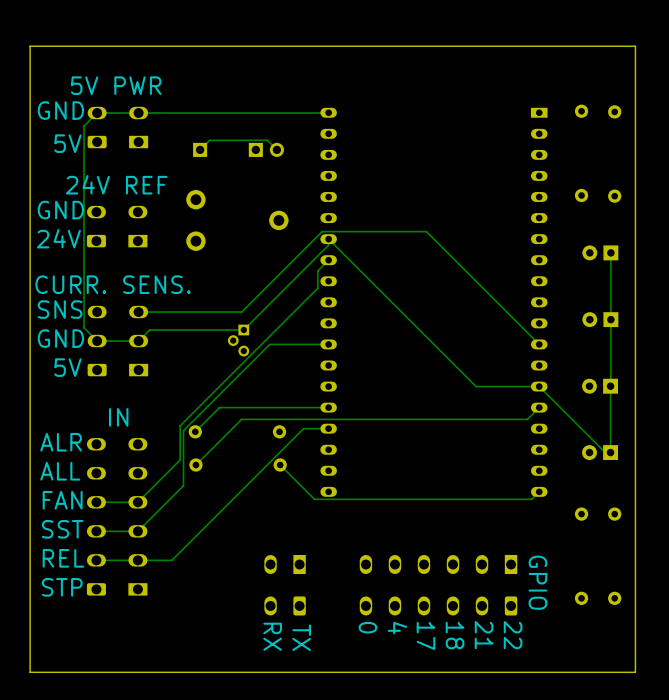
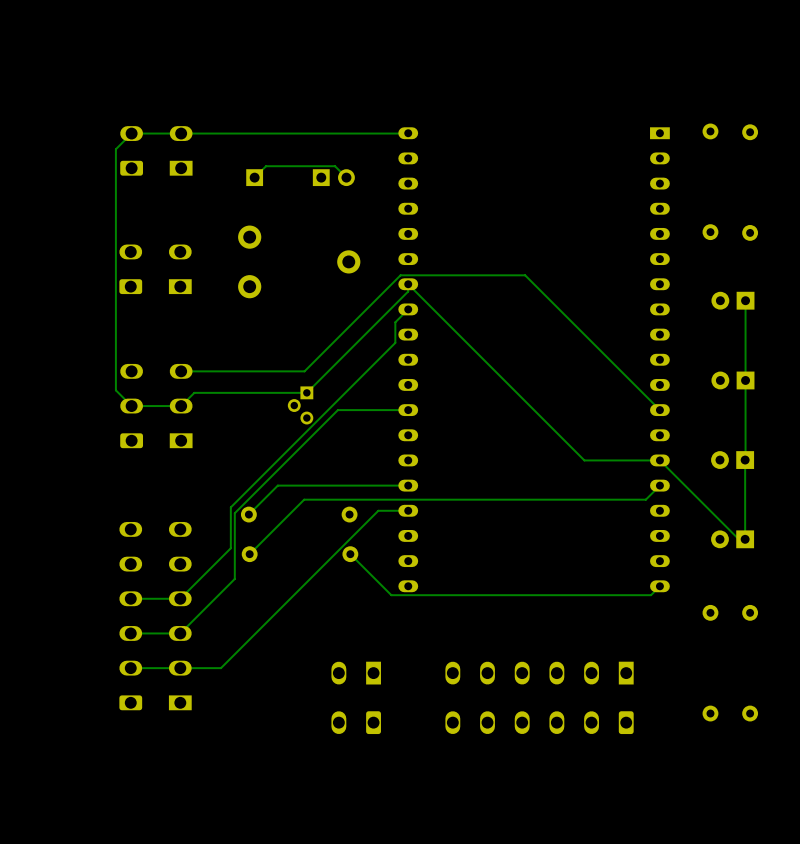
board edge: (635, 46) (30, 46) (30, 672) (635, 672) (635, 46) -> none
text: 5V PWR (116, 85) -> none
text: GND (60, 110) -> none
text: 5V (67, 143) -> none
text: 24V REF (116, 184) -> none
text: GND (60, 210) -> none
text: 24V (58, 238) -> none
text: CURR. SENS. (113, 284) -> none
text: SNS (60, 309) -> none
text: GND (60, 338) -> none
text: 5V (67, 367) -> none
text: IN (118, 417) -> none
text: ALR (61, 442) -> none
text: ALL (60, 471) -> none
text: FAN (62, 500) -> none
text: SST (62, 529) -> none
text: REL (63, 558) -> none
text: GPIO (537, 582) -> none
text: STP (62, 587) -> none
text: 0 (367, 627) -> none
text: 4 (397, 628) -> none
text: 17 (426, 635) -> none
text: 18 (455, 635) -> none
text: 21 (484, 635) -> none
text: 22 (513, 635) -> none
text: RX (272, 636) -> none
text: TX (301, 637) -> none

